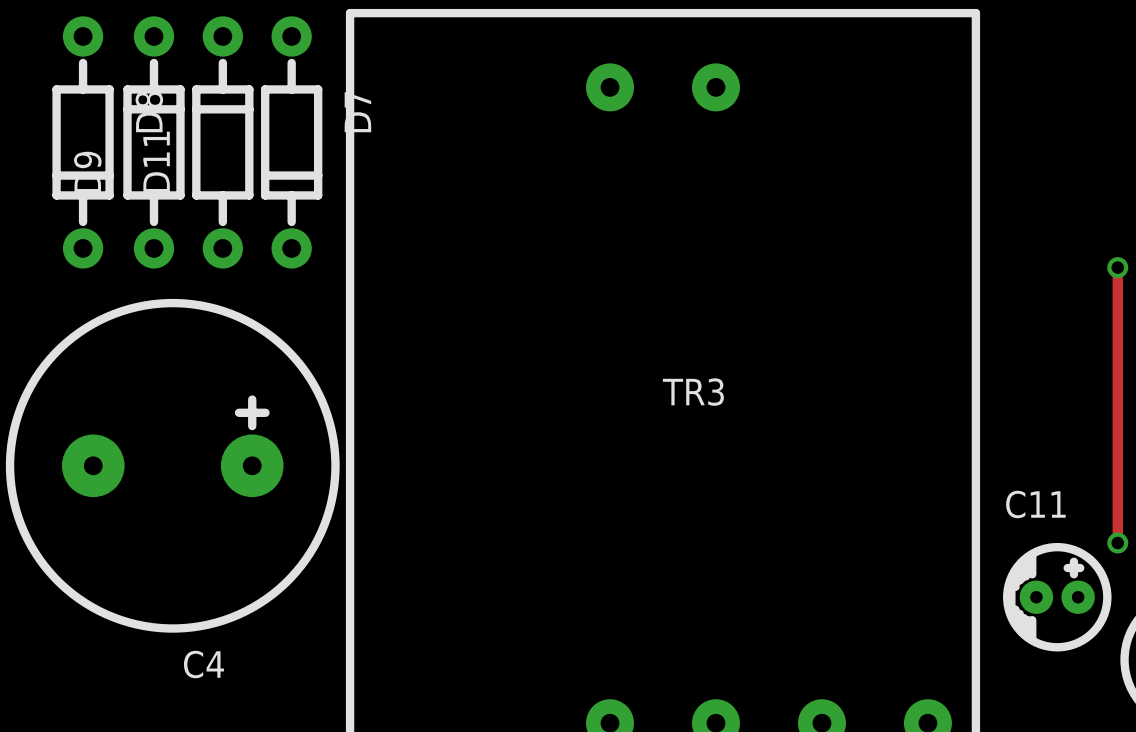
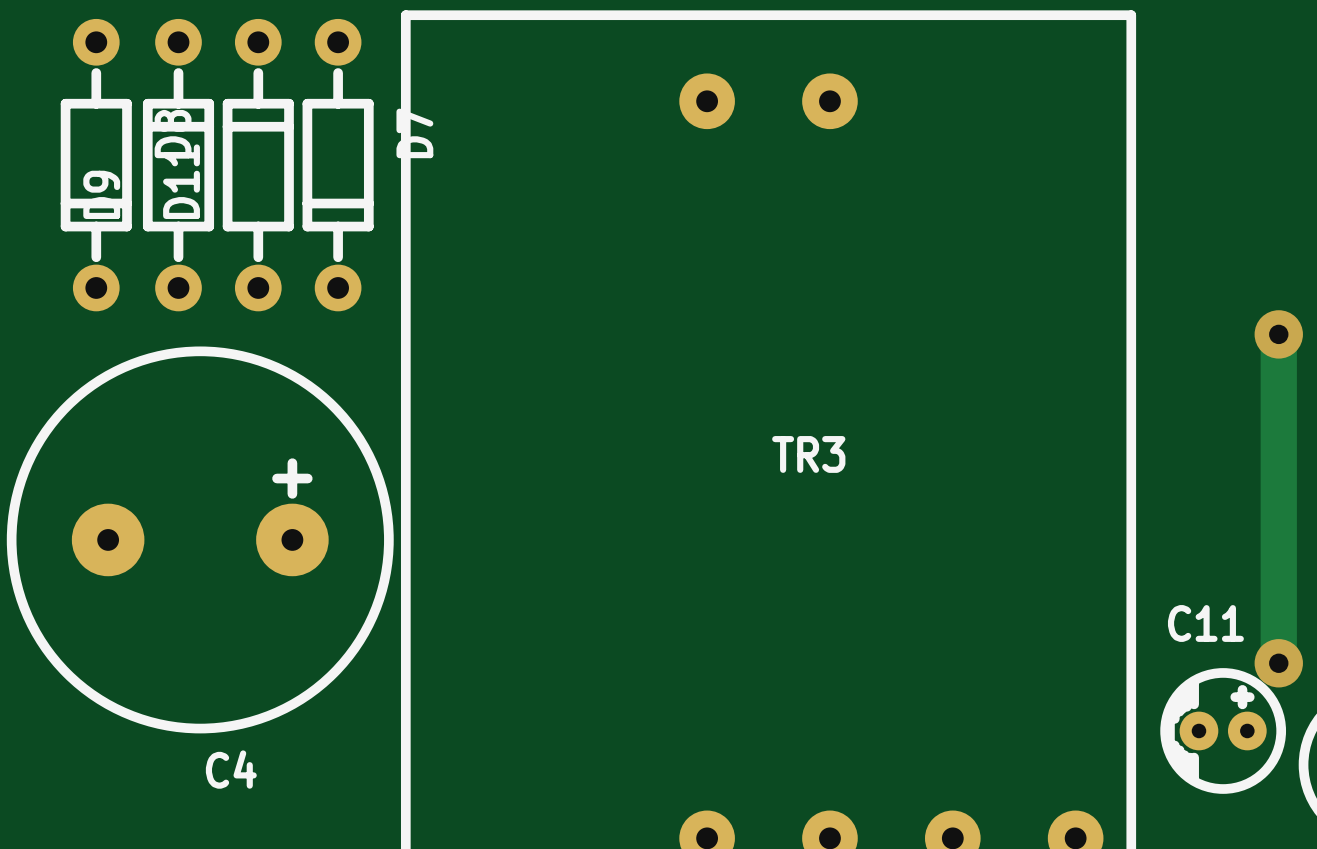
track: (1117, 267) (1117, 542) -> none
via: (1117, 267) -> none
track: none -> (1278, 334) (1278, 663)
via: none -> (1278, 334)
via: (1117, 542) -> none
via: none -> (1278, 663)
C11 position: (1057, 597) -> (1223, 730)

